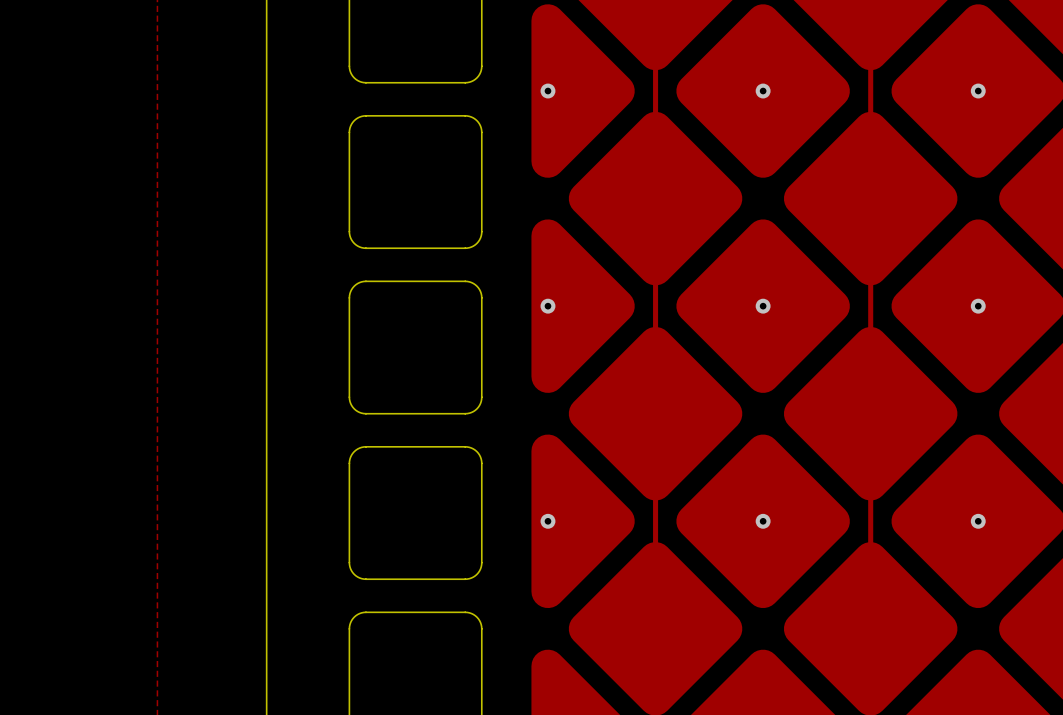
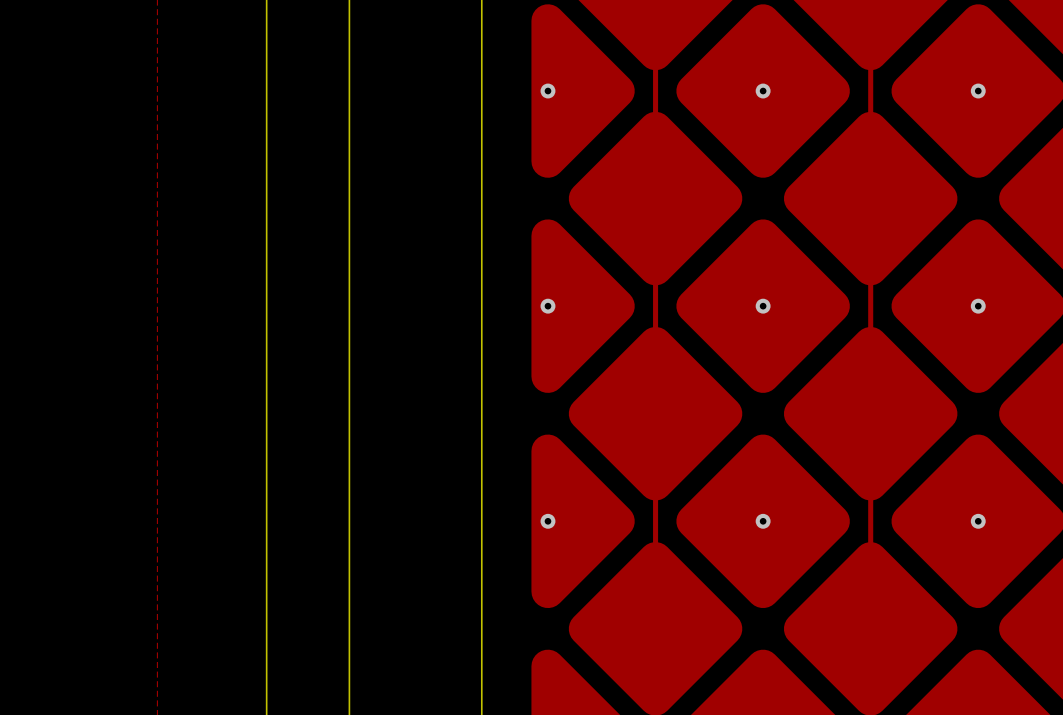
board edge: (349, 66) (354, 77) (365, 82) (467, 82) (476, 77) (481, 66) -> (349, 66) (349, 132)
board edge: (349, 132) (354, 120) (365, 115) (467, 115) (476, 120) (481, 132) -> (481, 66) (481, 132)
board edge: (349, 231) (354, 243) (365, 248) (467, 248) (476, 243) (481, 231) -> (349, 231) (349, 297)
board edge: (349, 297) (354, 286) (365, 281) (467, 281) (476, 286) (481, 297) -> (481, 231) (481, 297)
board edge: (349, 397) (354, 408) (365, 413) (467, 413) (476, 408) (481, 397) -> (349, 397) (349, 463)
board edge: (349, 463) (354, 451) (365, 446) (467, 446) (476, 451) (481, 463) -> (481, 397) (481, 463)
board edge: (349, 562) (354, 574) (365, 579) (467, 579) (476, 574) (481, 562) -> (349, 562) (349, 628)
board edge: (349, 628) (354, 617) (365, 612) (467, 612) (476, 617) (481, 628) -> (481, 562) (481, 628)

